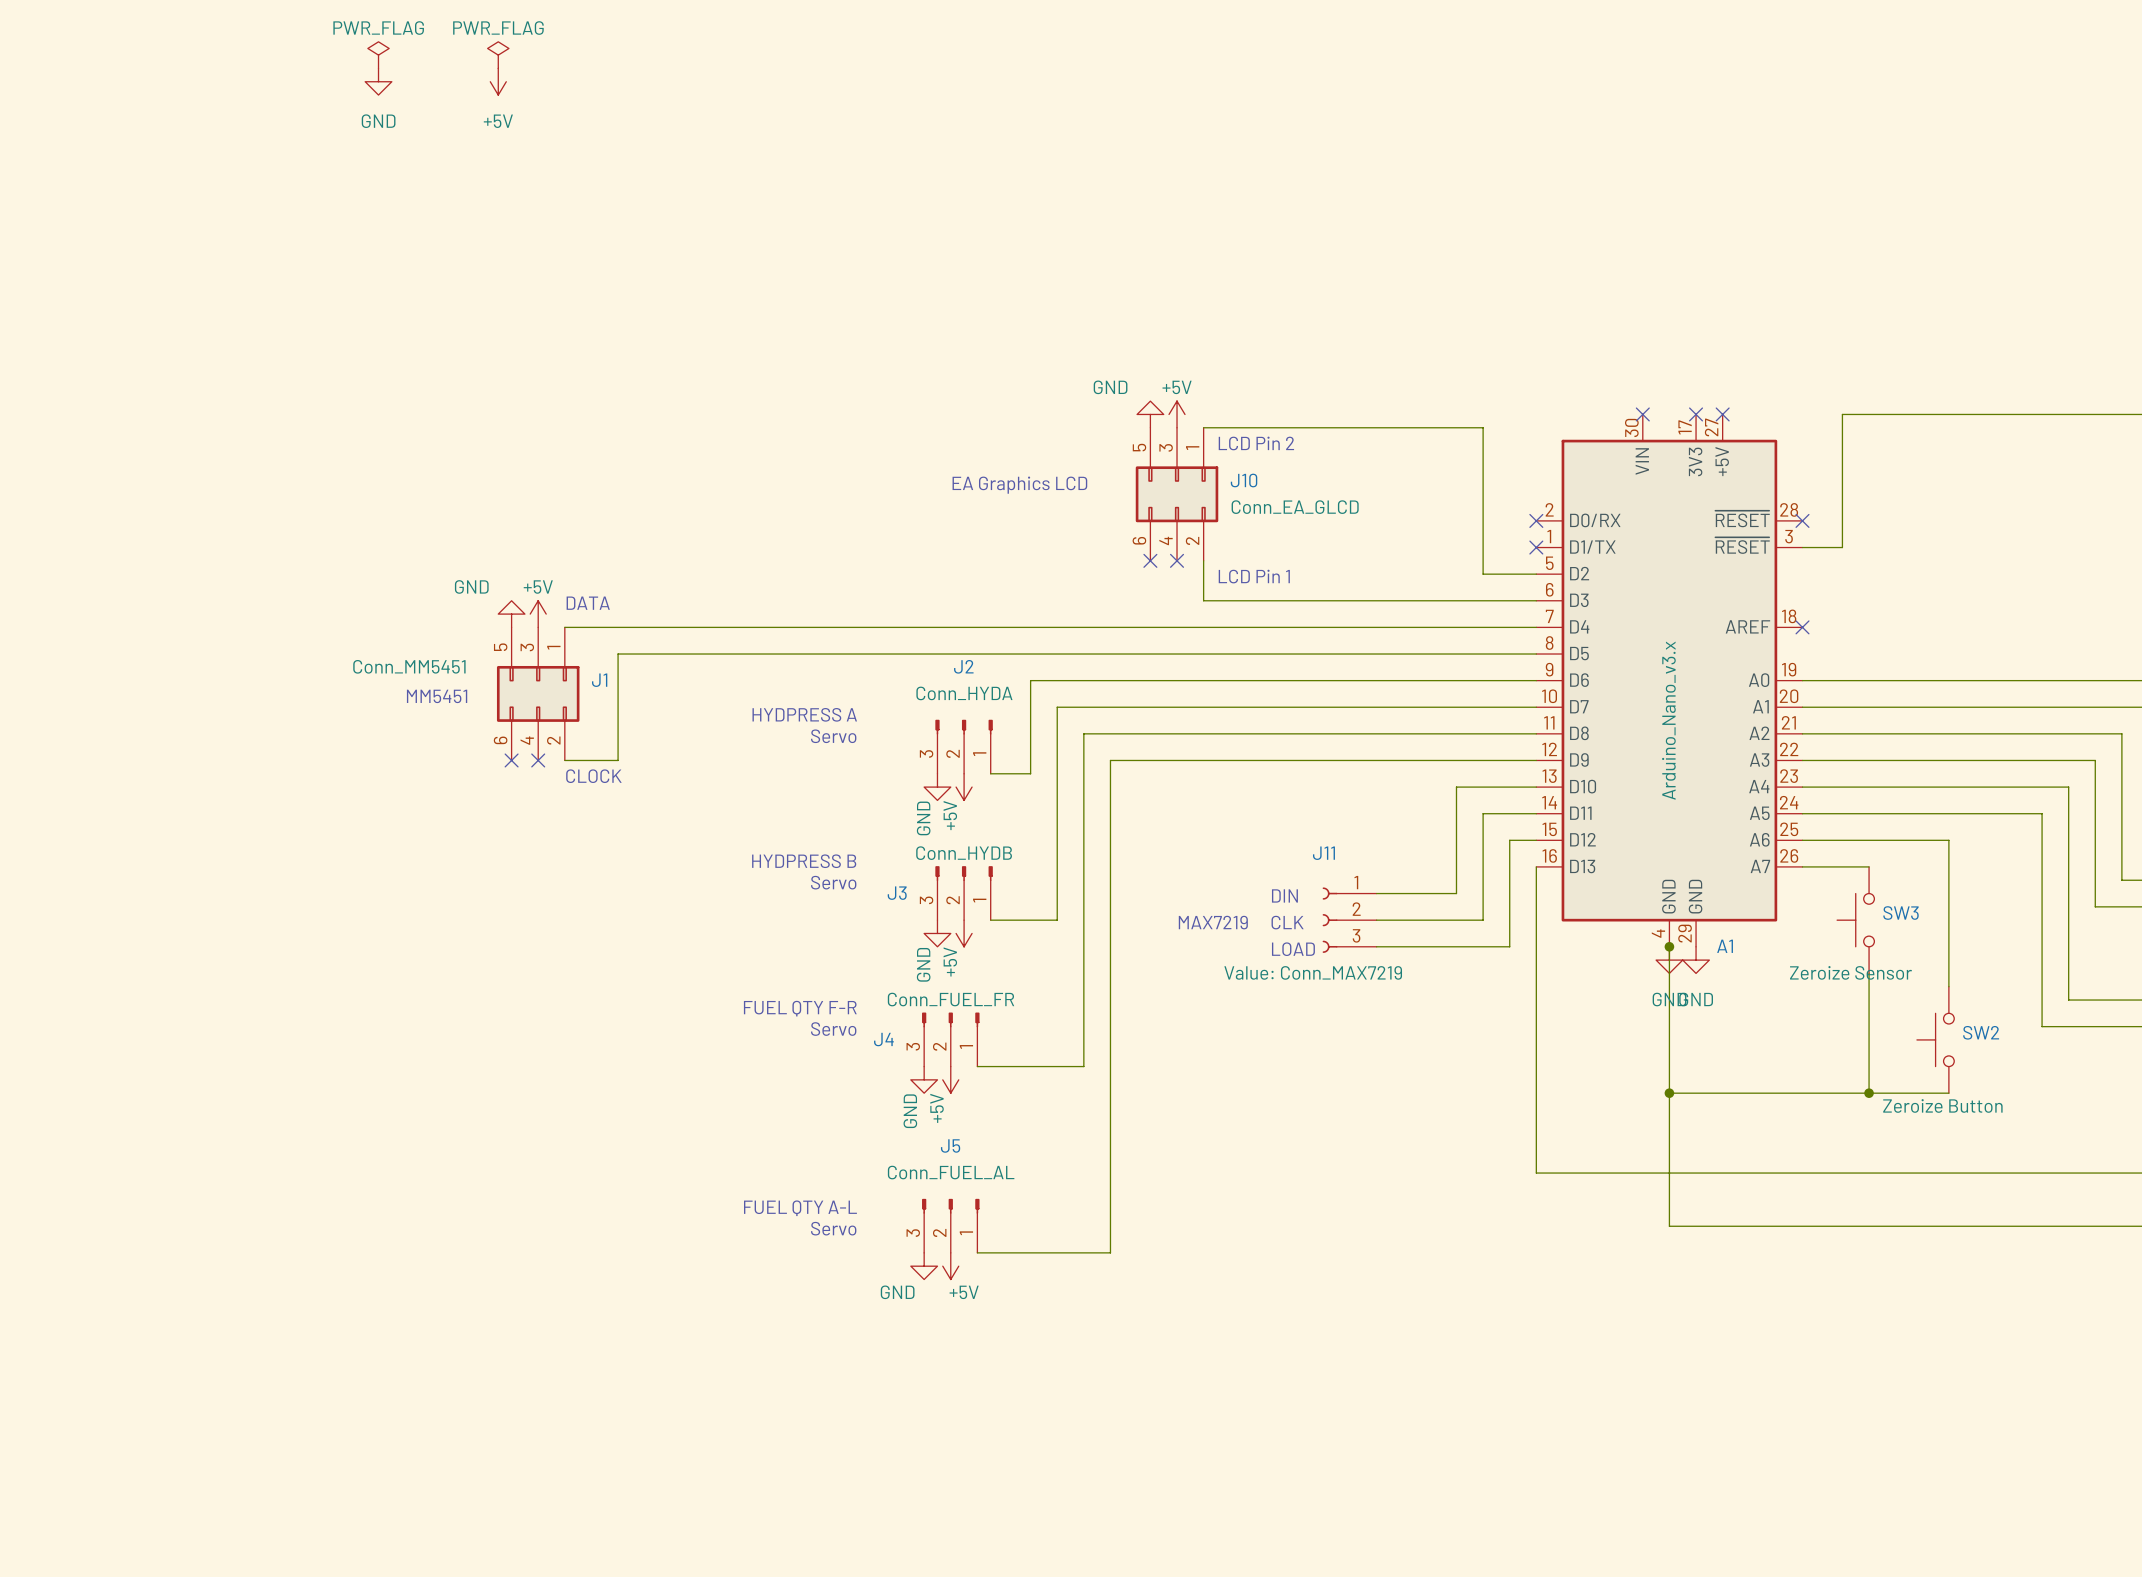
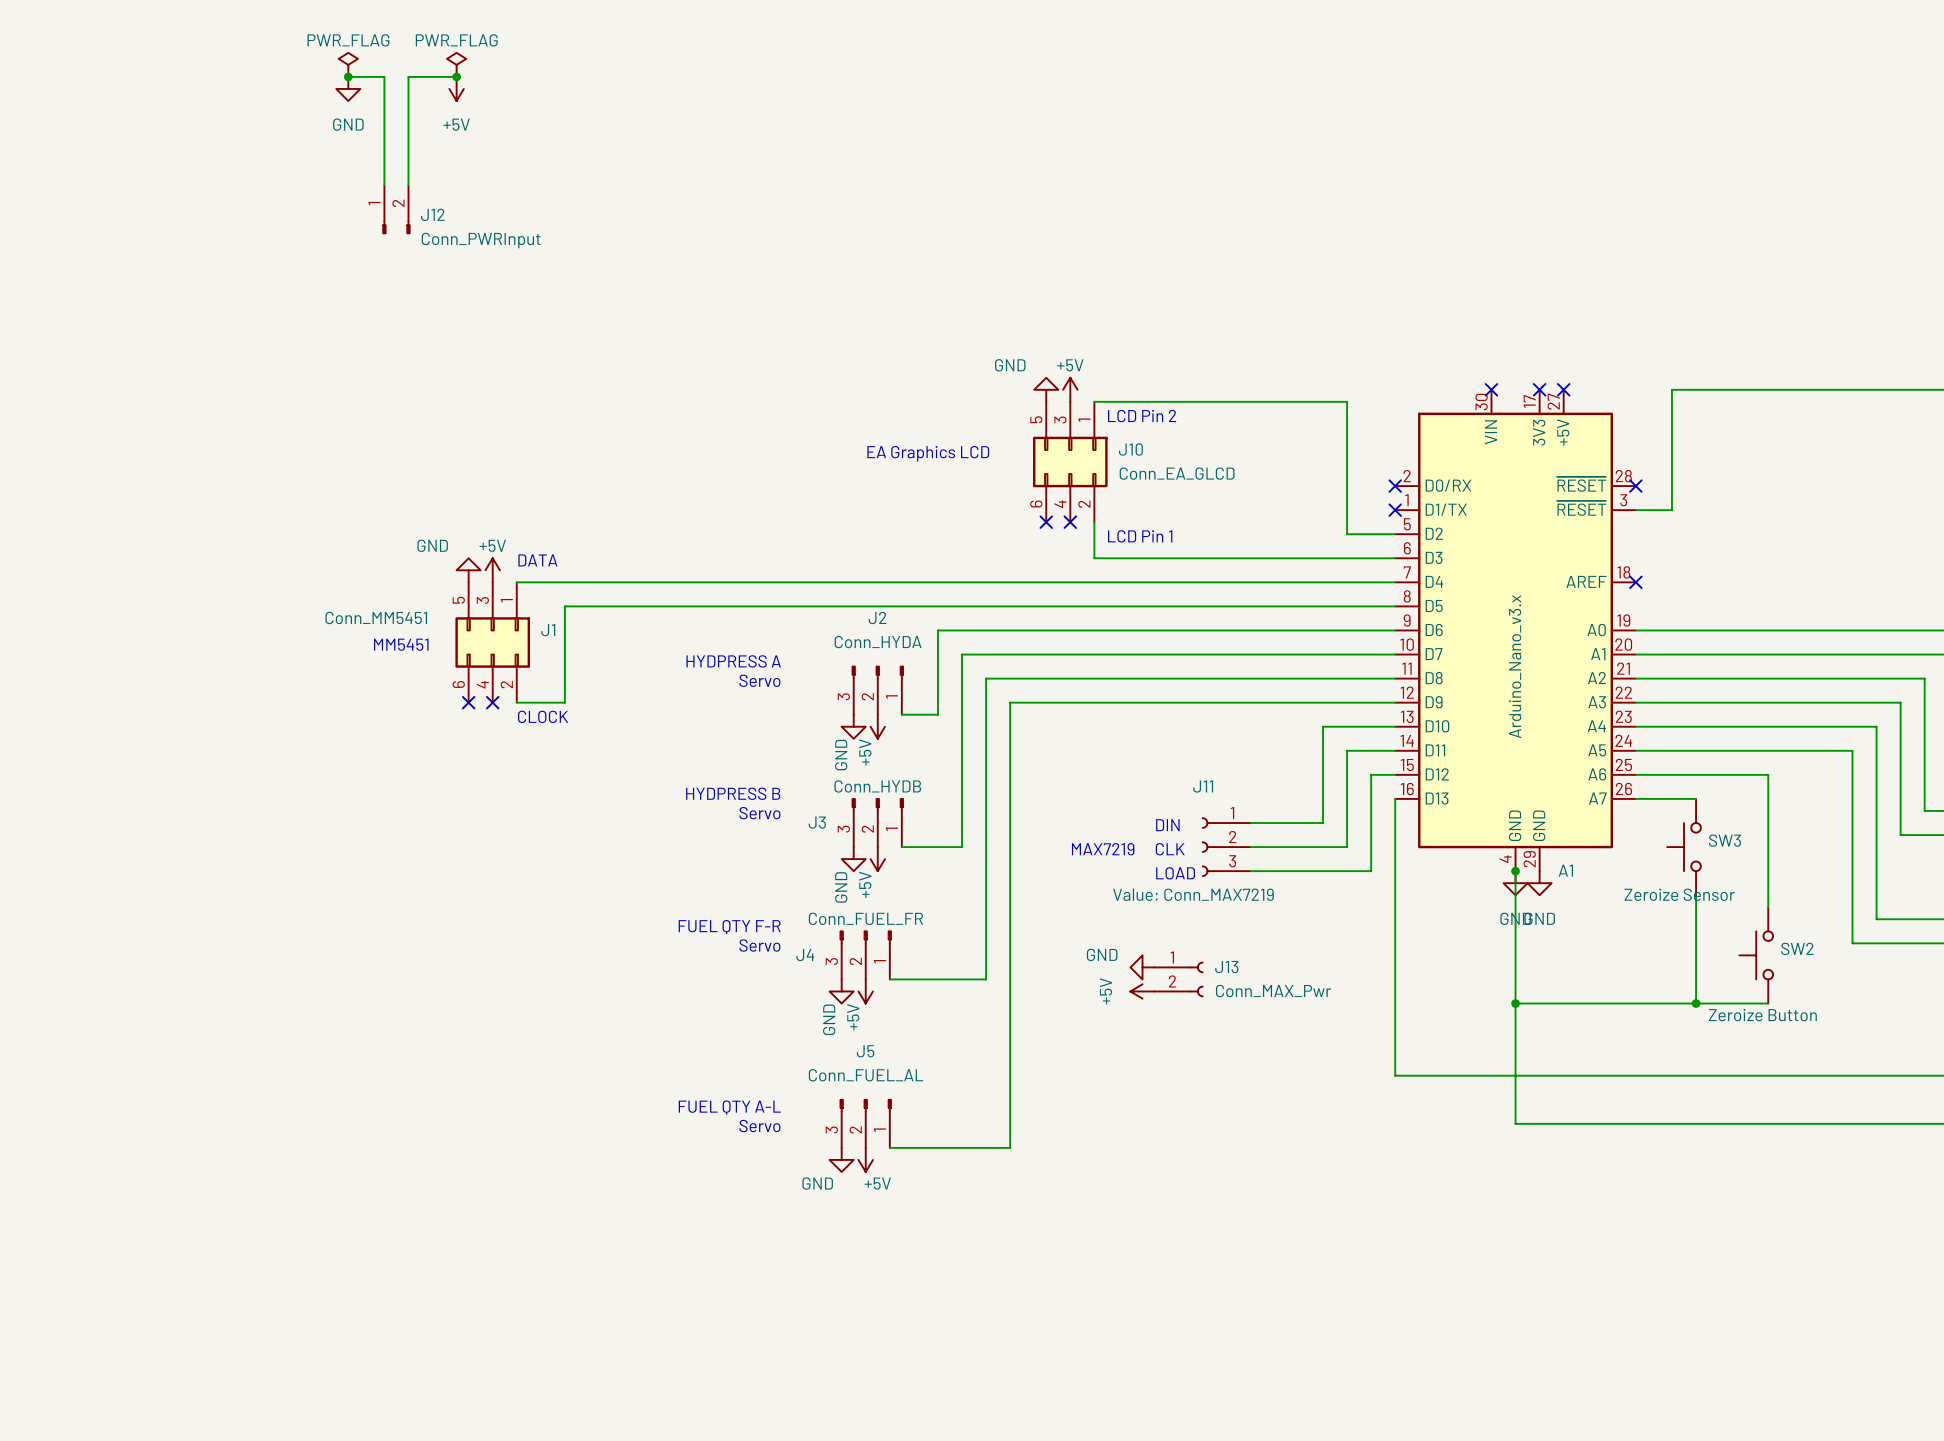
wire: none -> (348, 76) (384, 76) (384, 185)
junction: none -> (348, 76)
wire: none -> (456, 76) (408, 76) (408, 185)
junction: none -> (456, 76)
J12: none -> Conn_PWRInput (396, 209)
power symbol: none -> GND (1142, 967)
J13: none -> Conn_MAX_Pwr (1178, 979)
power symbol: none -> +5V (1142, 991)

